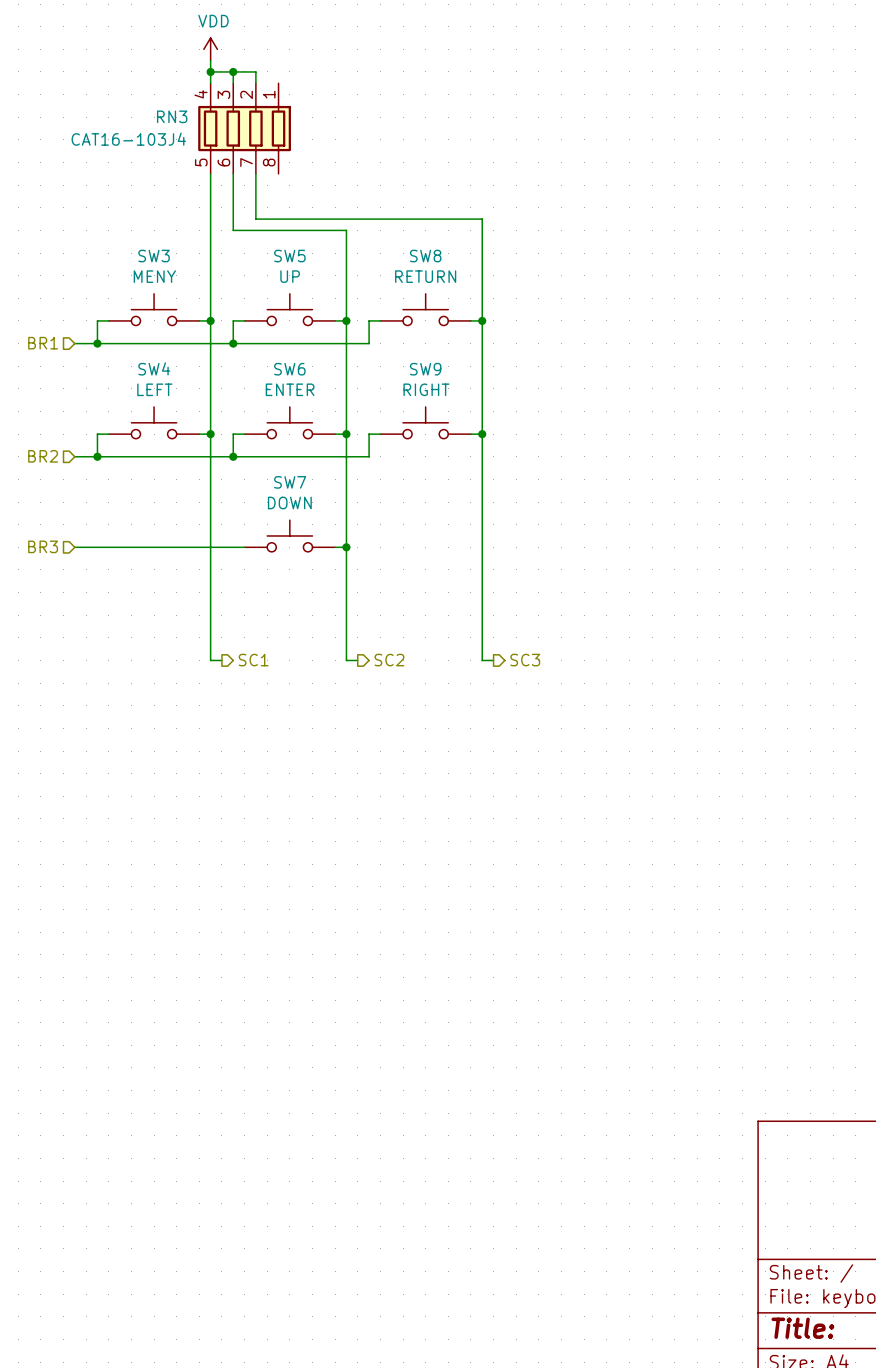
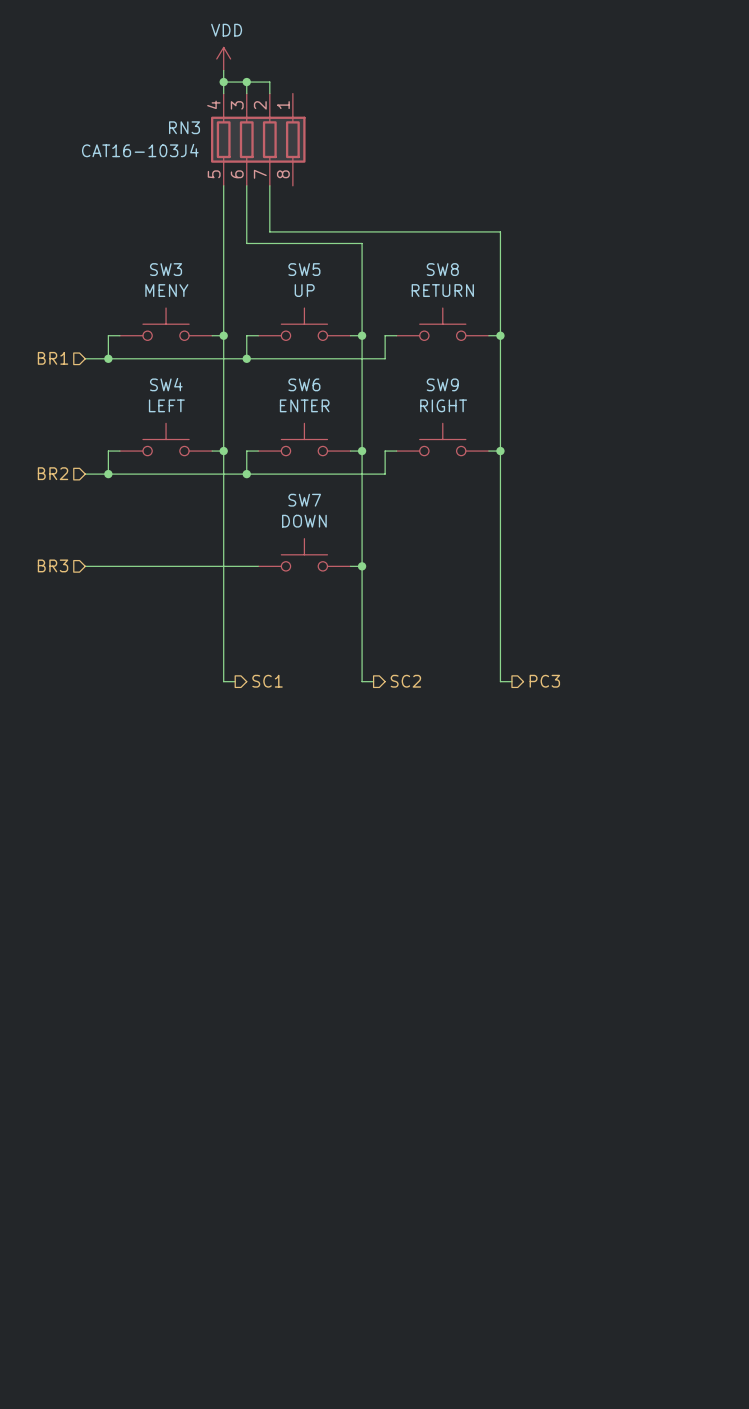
hierarchical label: SC3 (525, 660) -> PC3 (544, 681)

